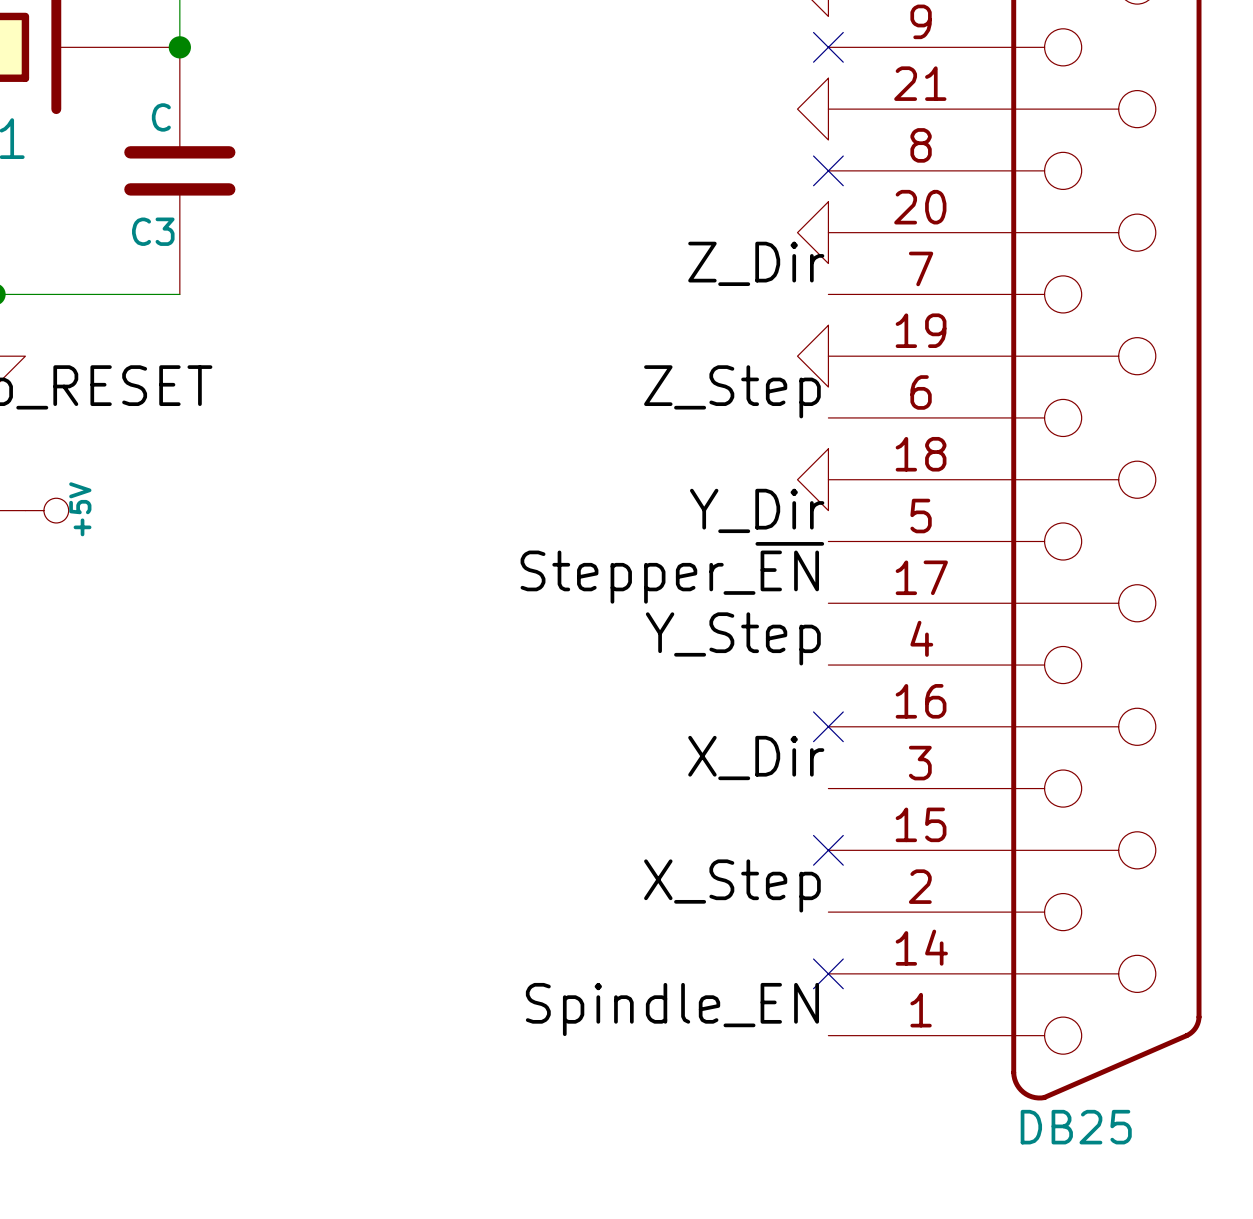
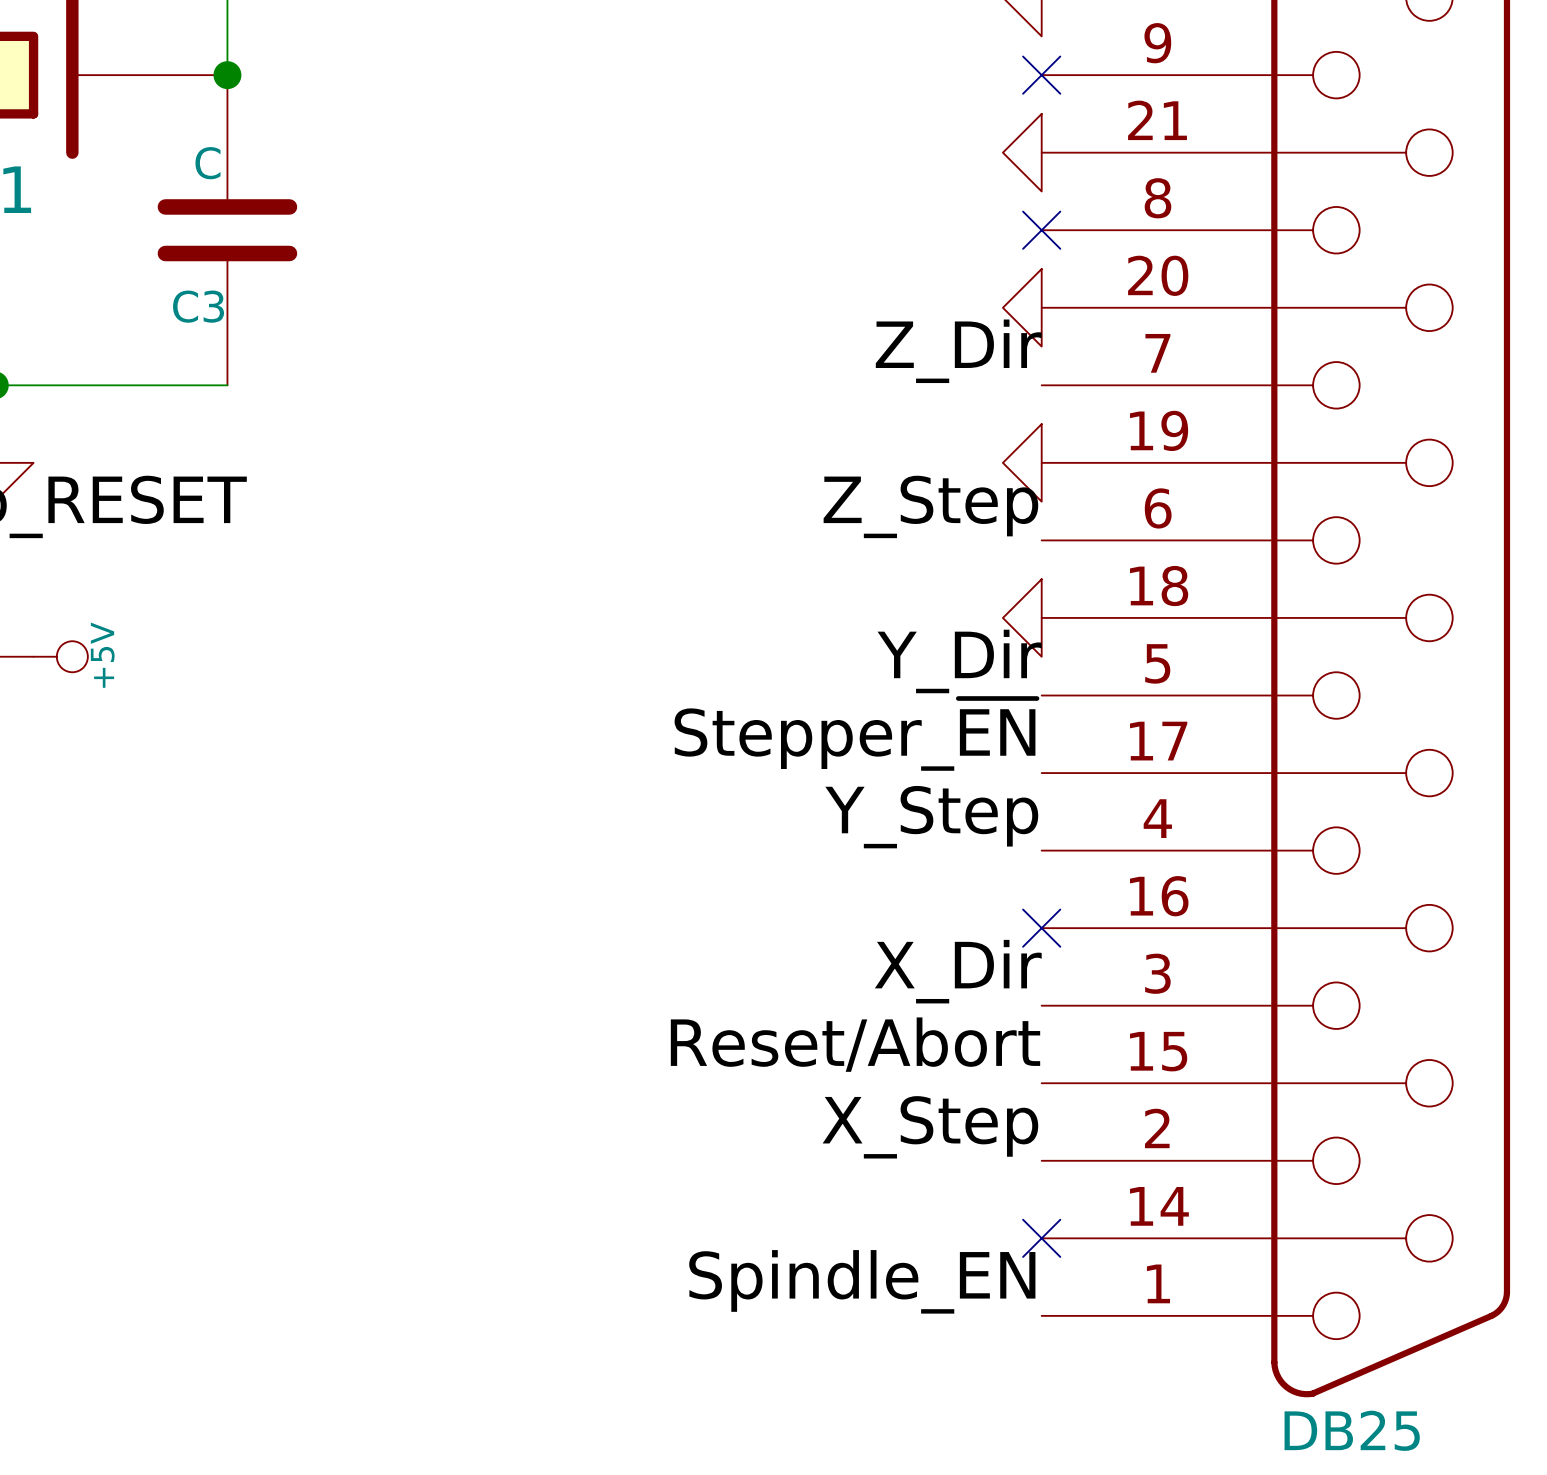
label: none -> Reset/Abort (855, 1044)
no-connect mark: (828, 850) -> none

